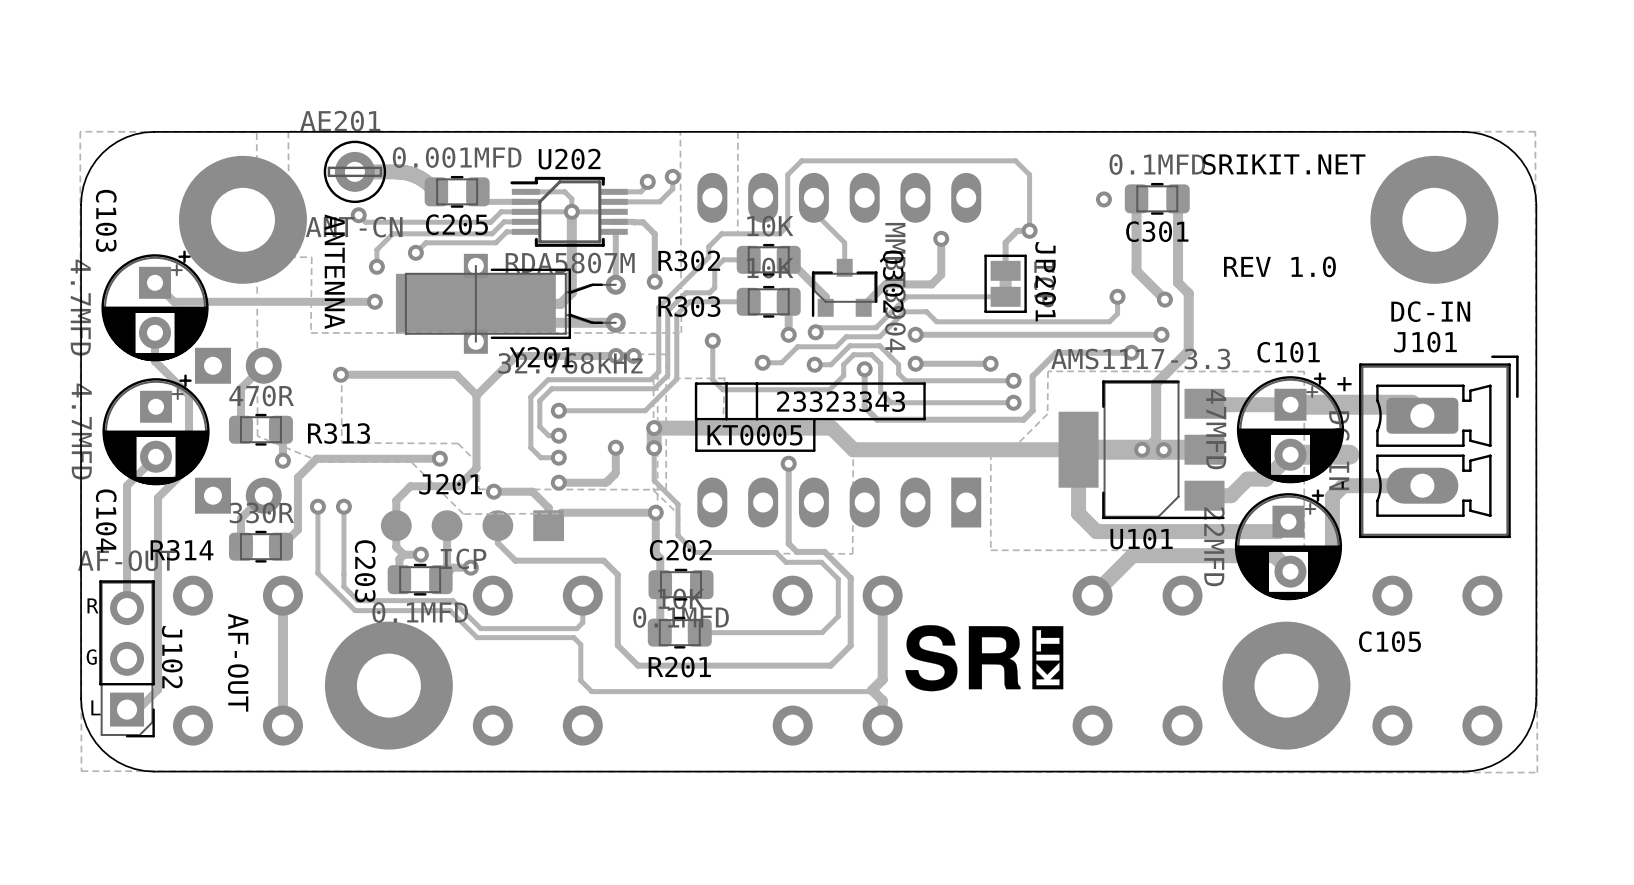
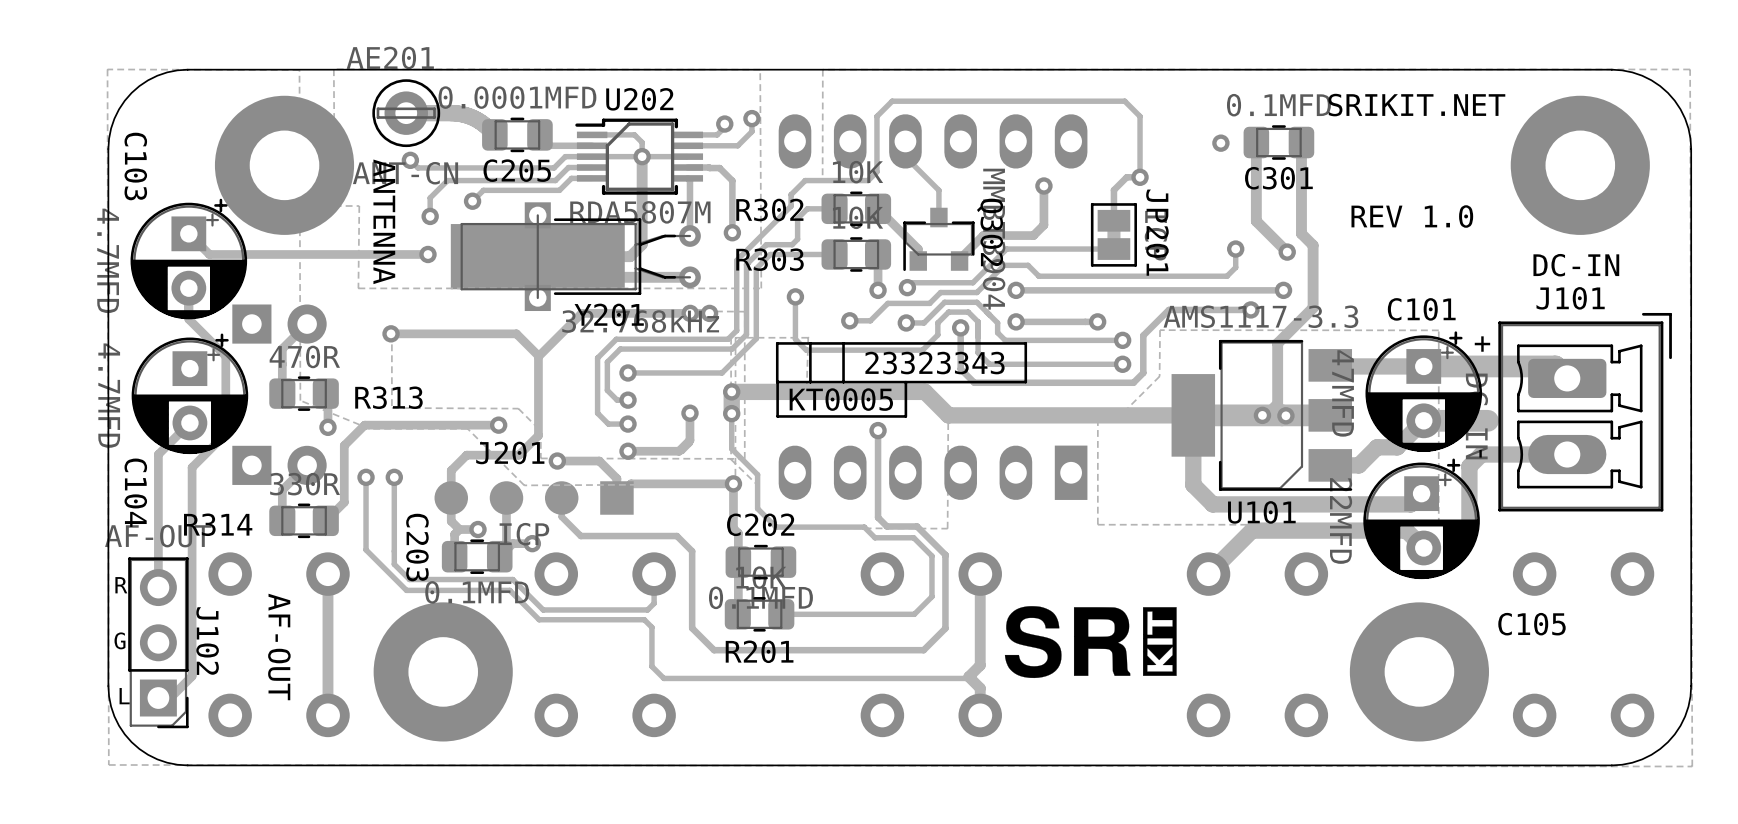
C205 value: 0.001MFD (457, 157) -> 0.0001MFD (517, 97)

